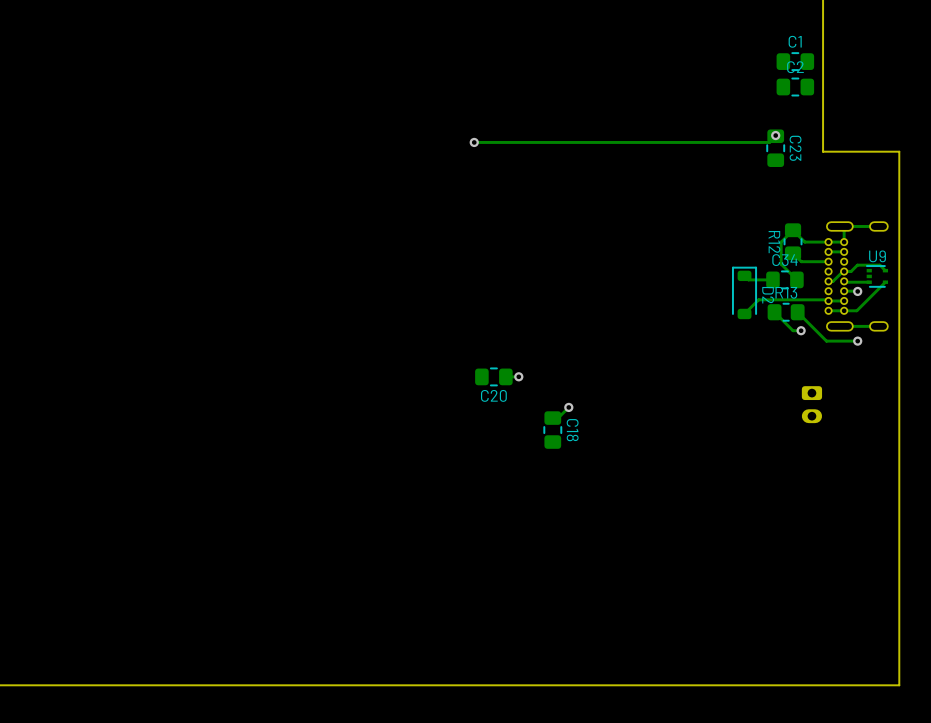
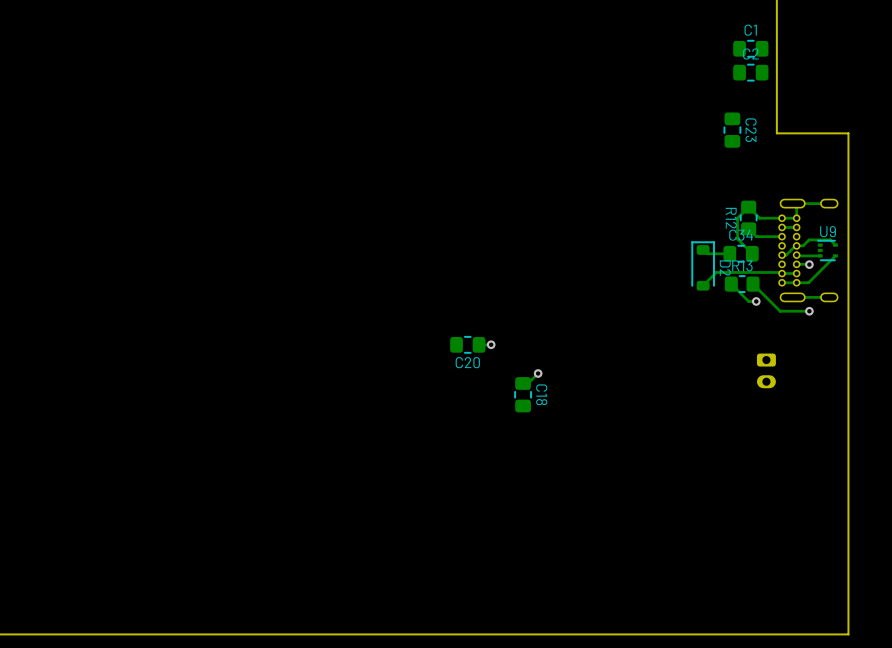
track: (775, 135) (769, 142) (474, 142) -> none
via: (775, 135) -> none
via: (474, 142) -> none

